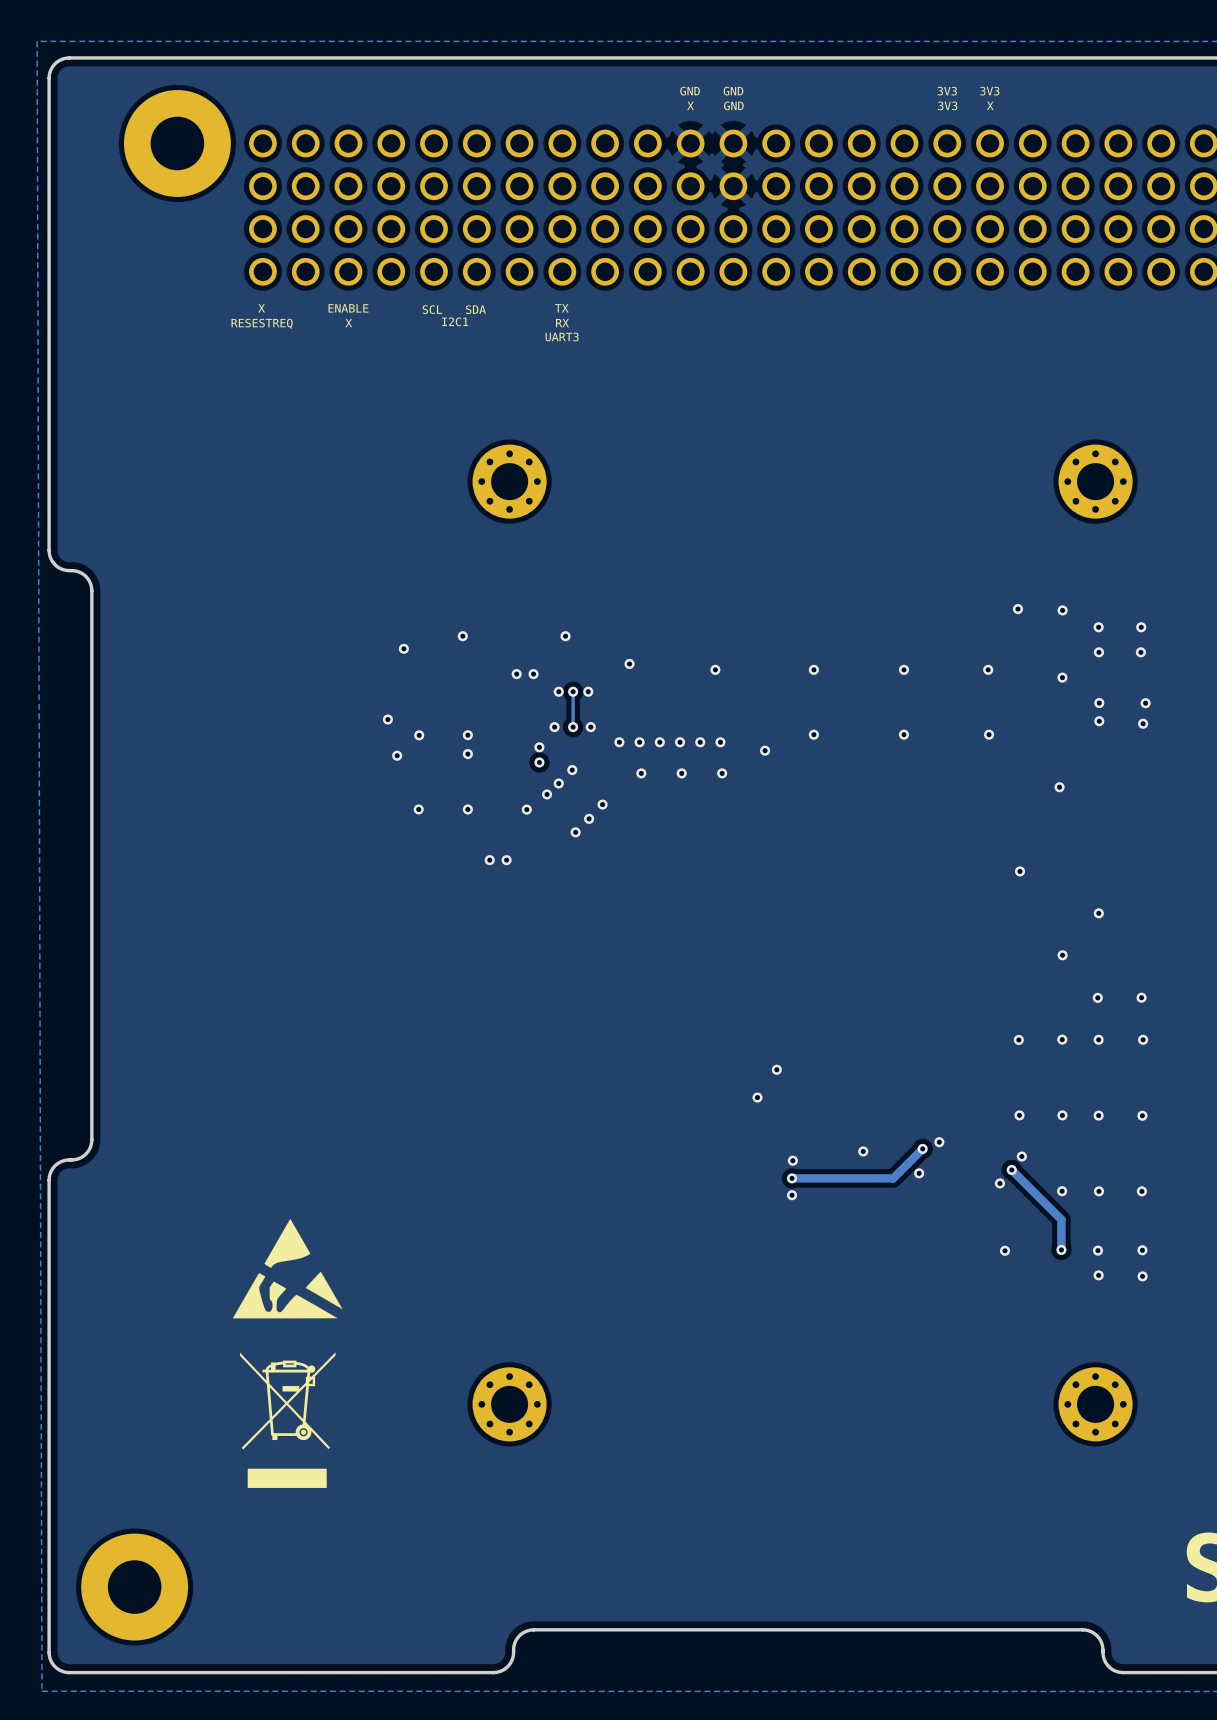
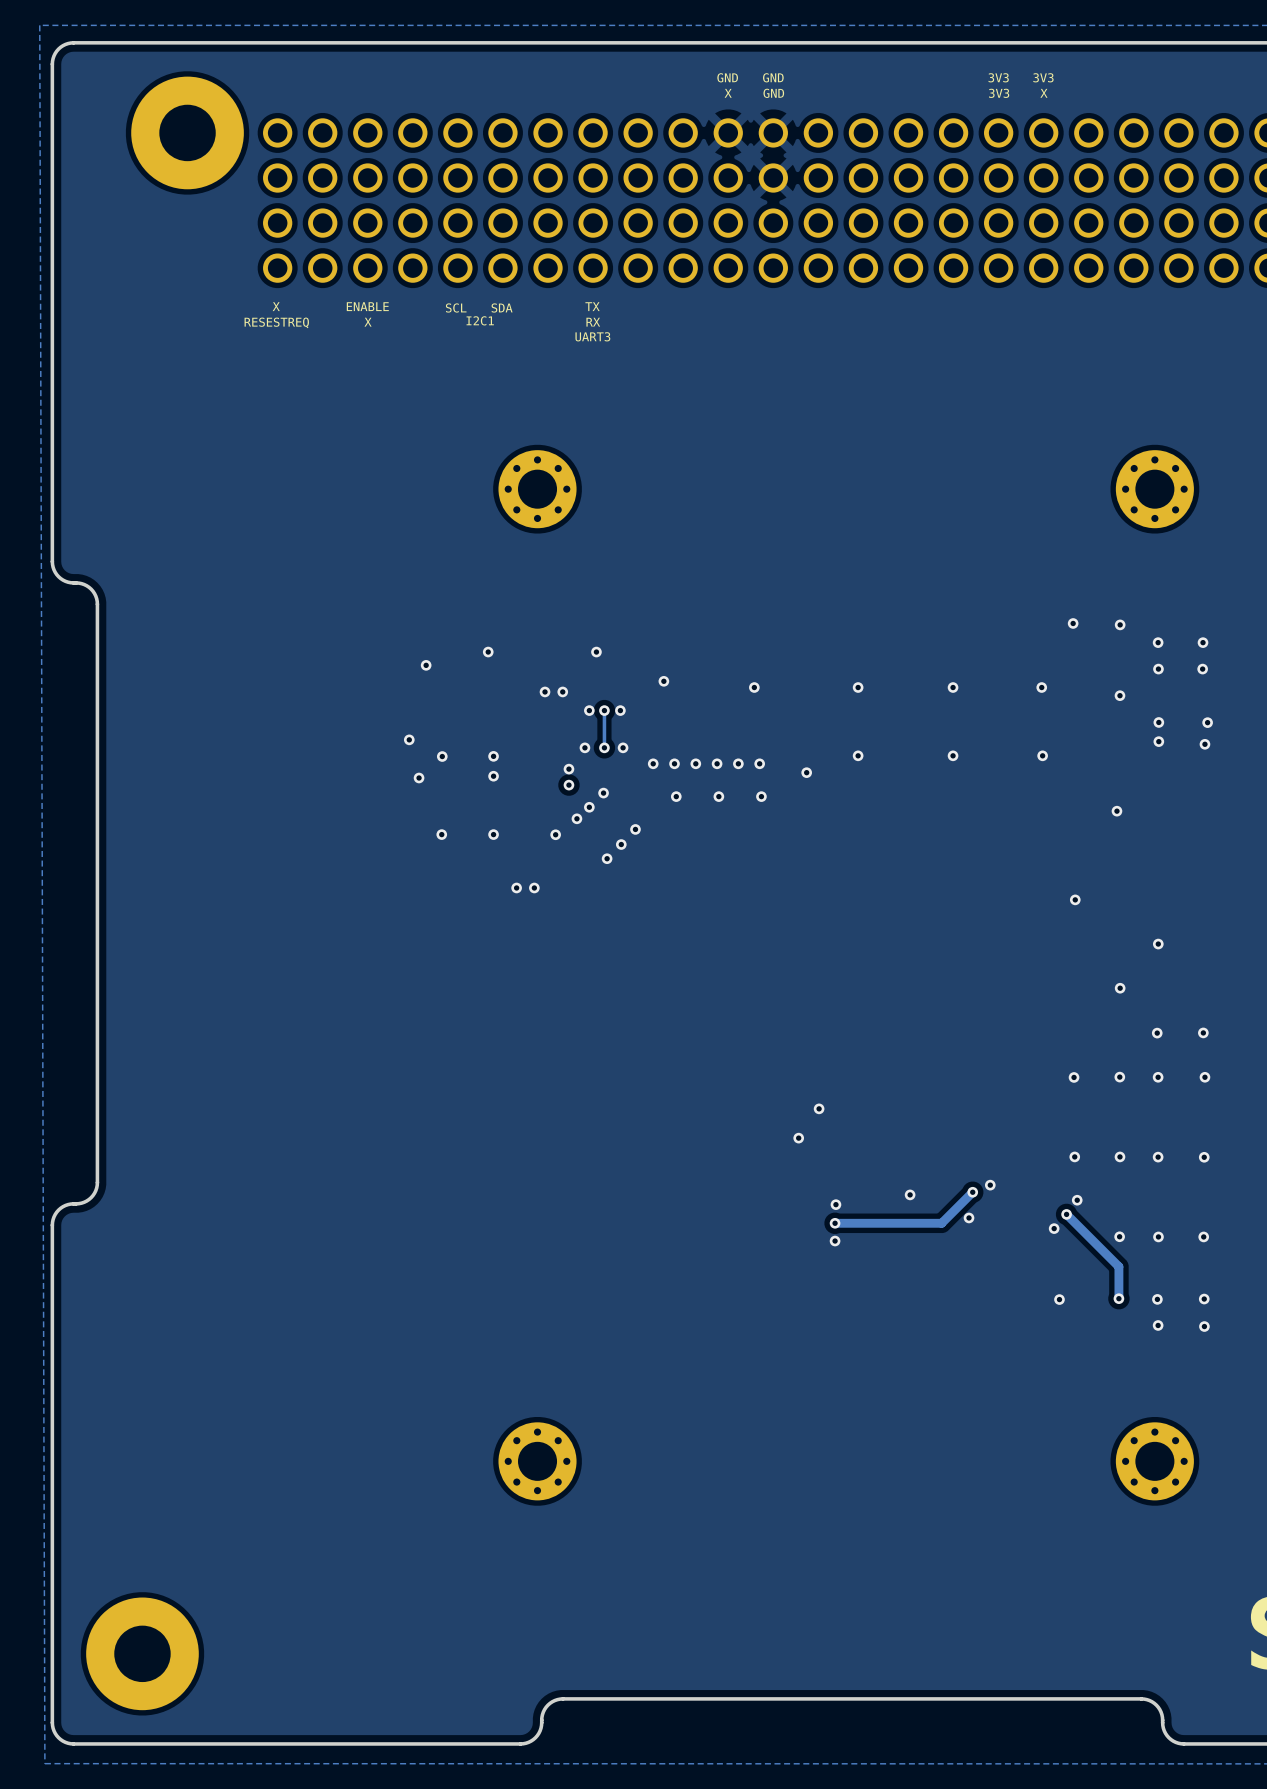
drawing: [232, 1219, 343, 1319] -> none
drawing: [240, 1352, 336, 1488] -> none

